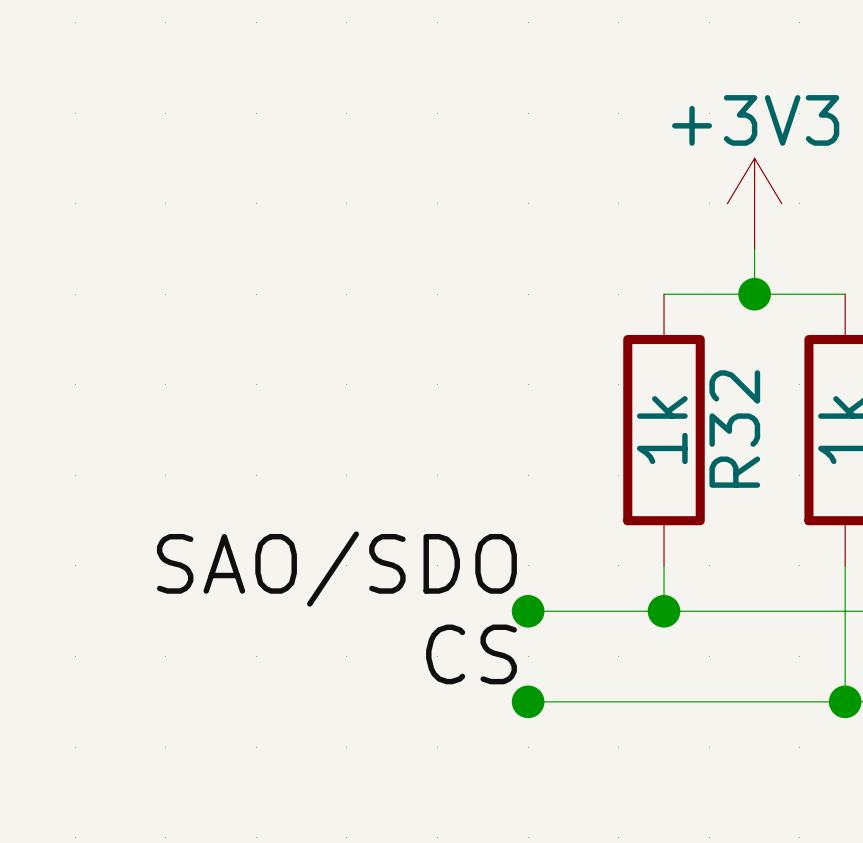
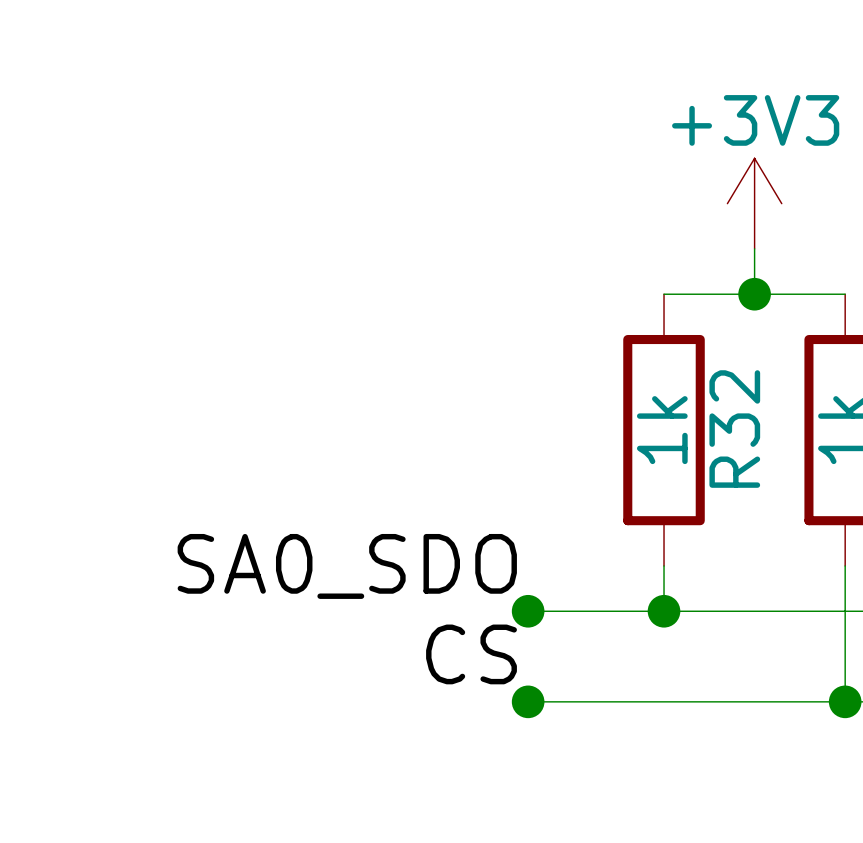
label: SAO/SDO (336, 569) -> SA0_SDO (347, 566)

